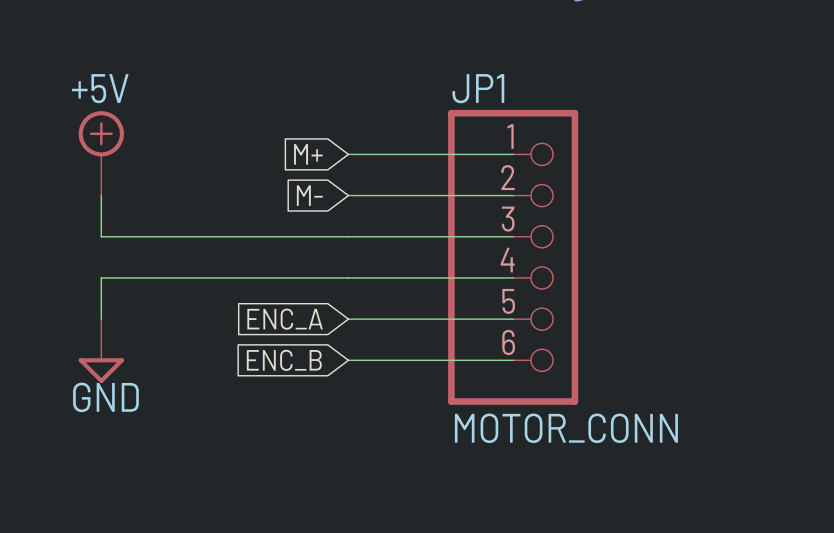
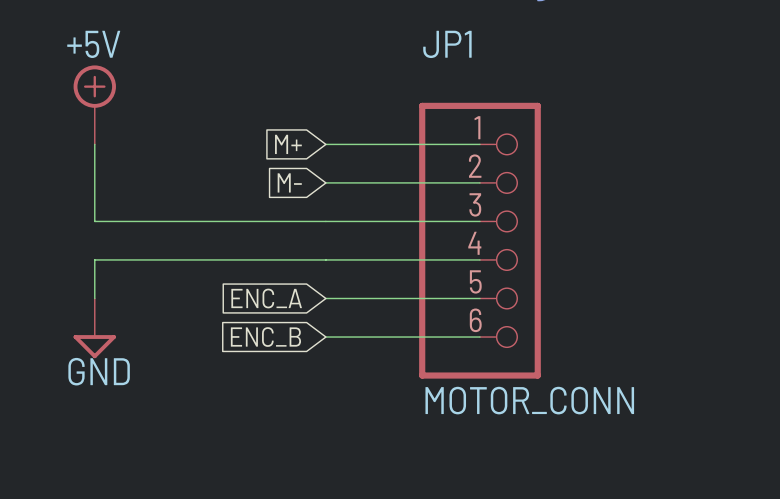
JP1 name position: JP1 (478, 88) -> JP1 (447, 44)
power symbol position: +5V (101, 153) -> +5V (94, 104)

